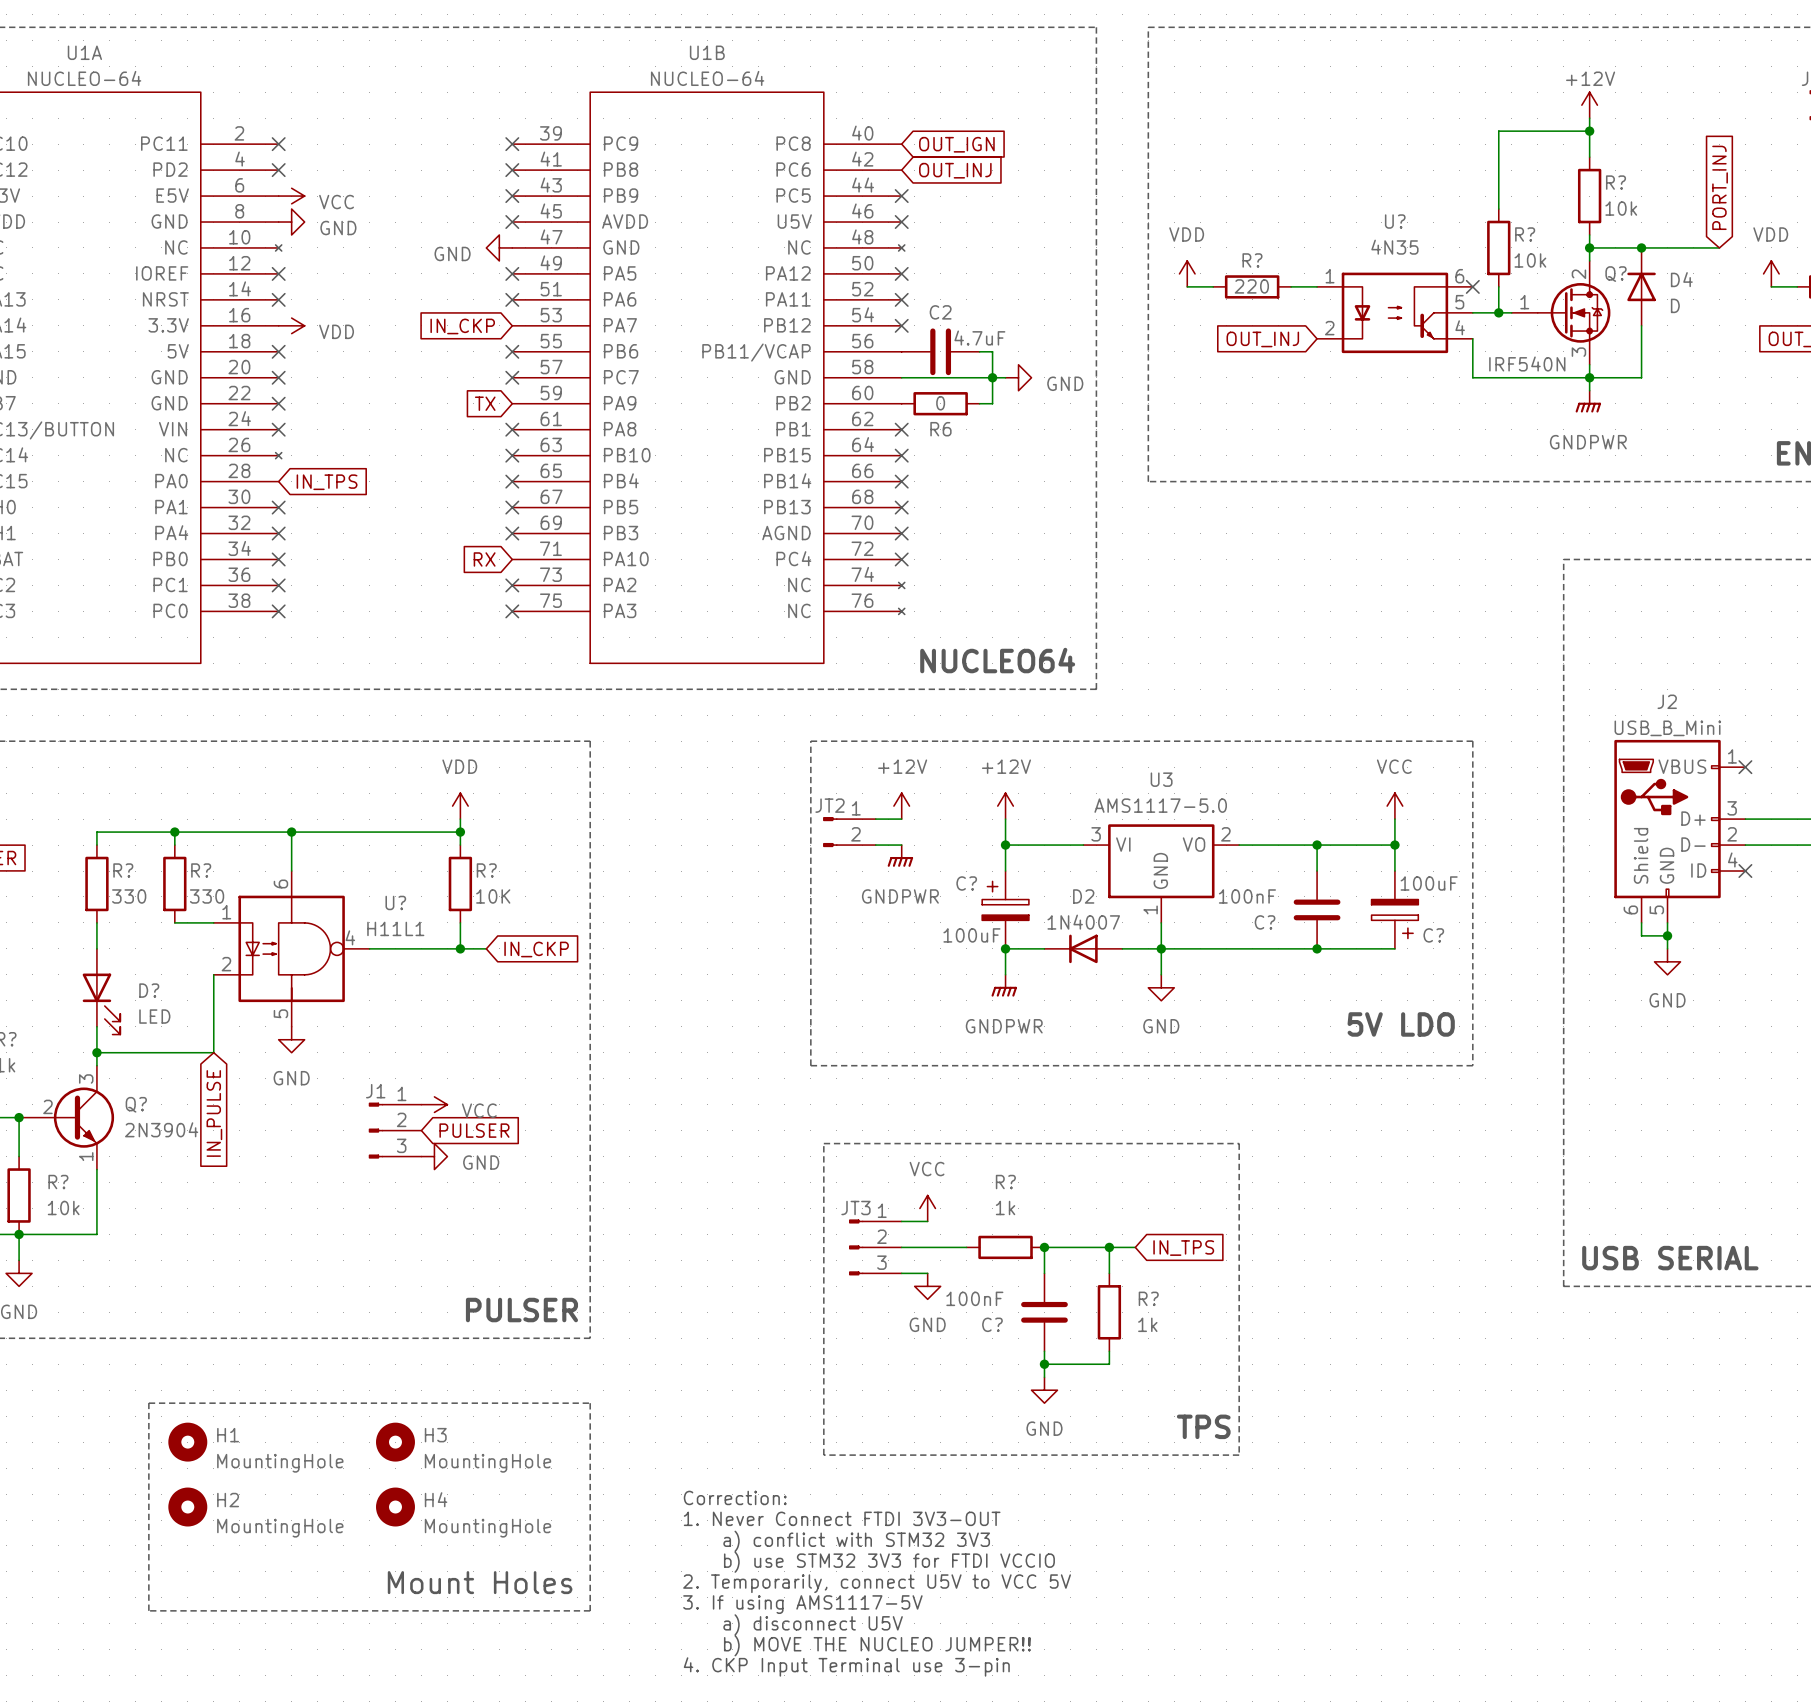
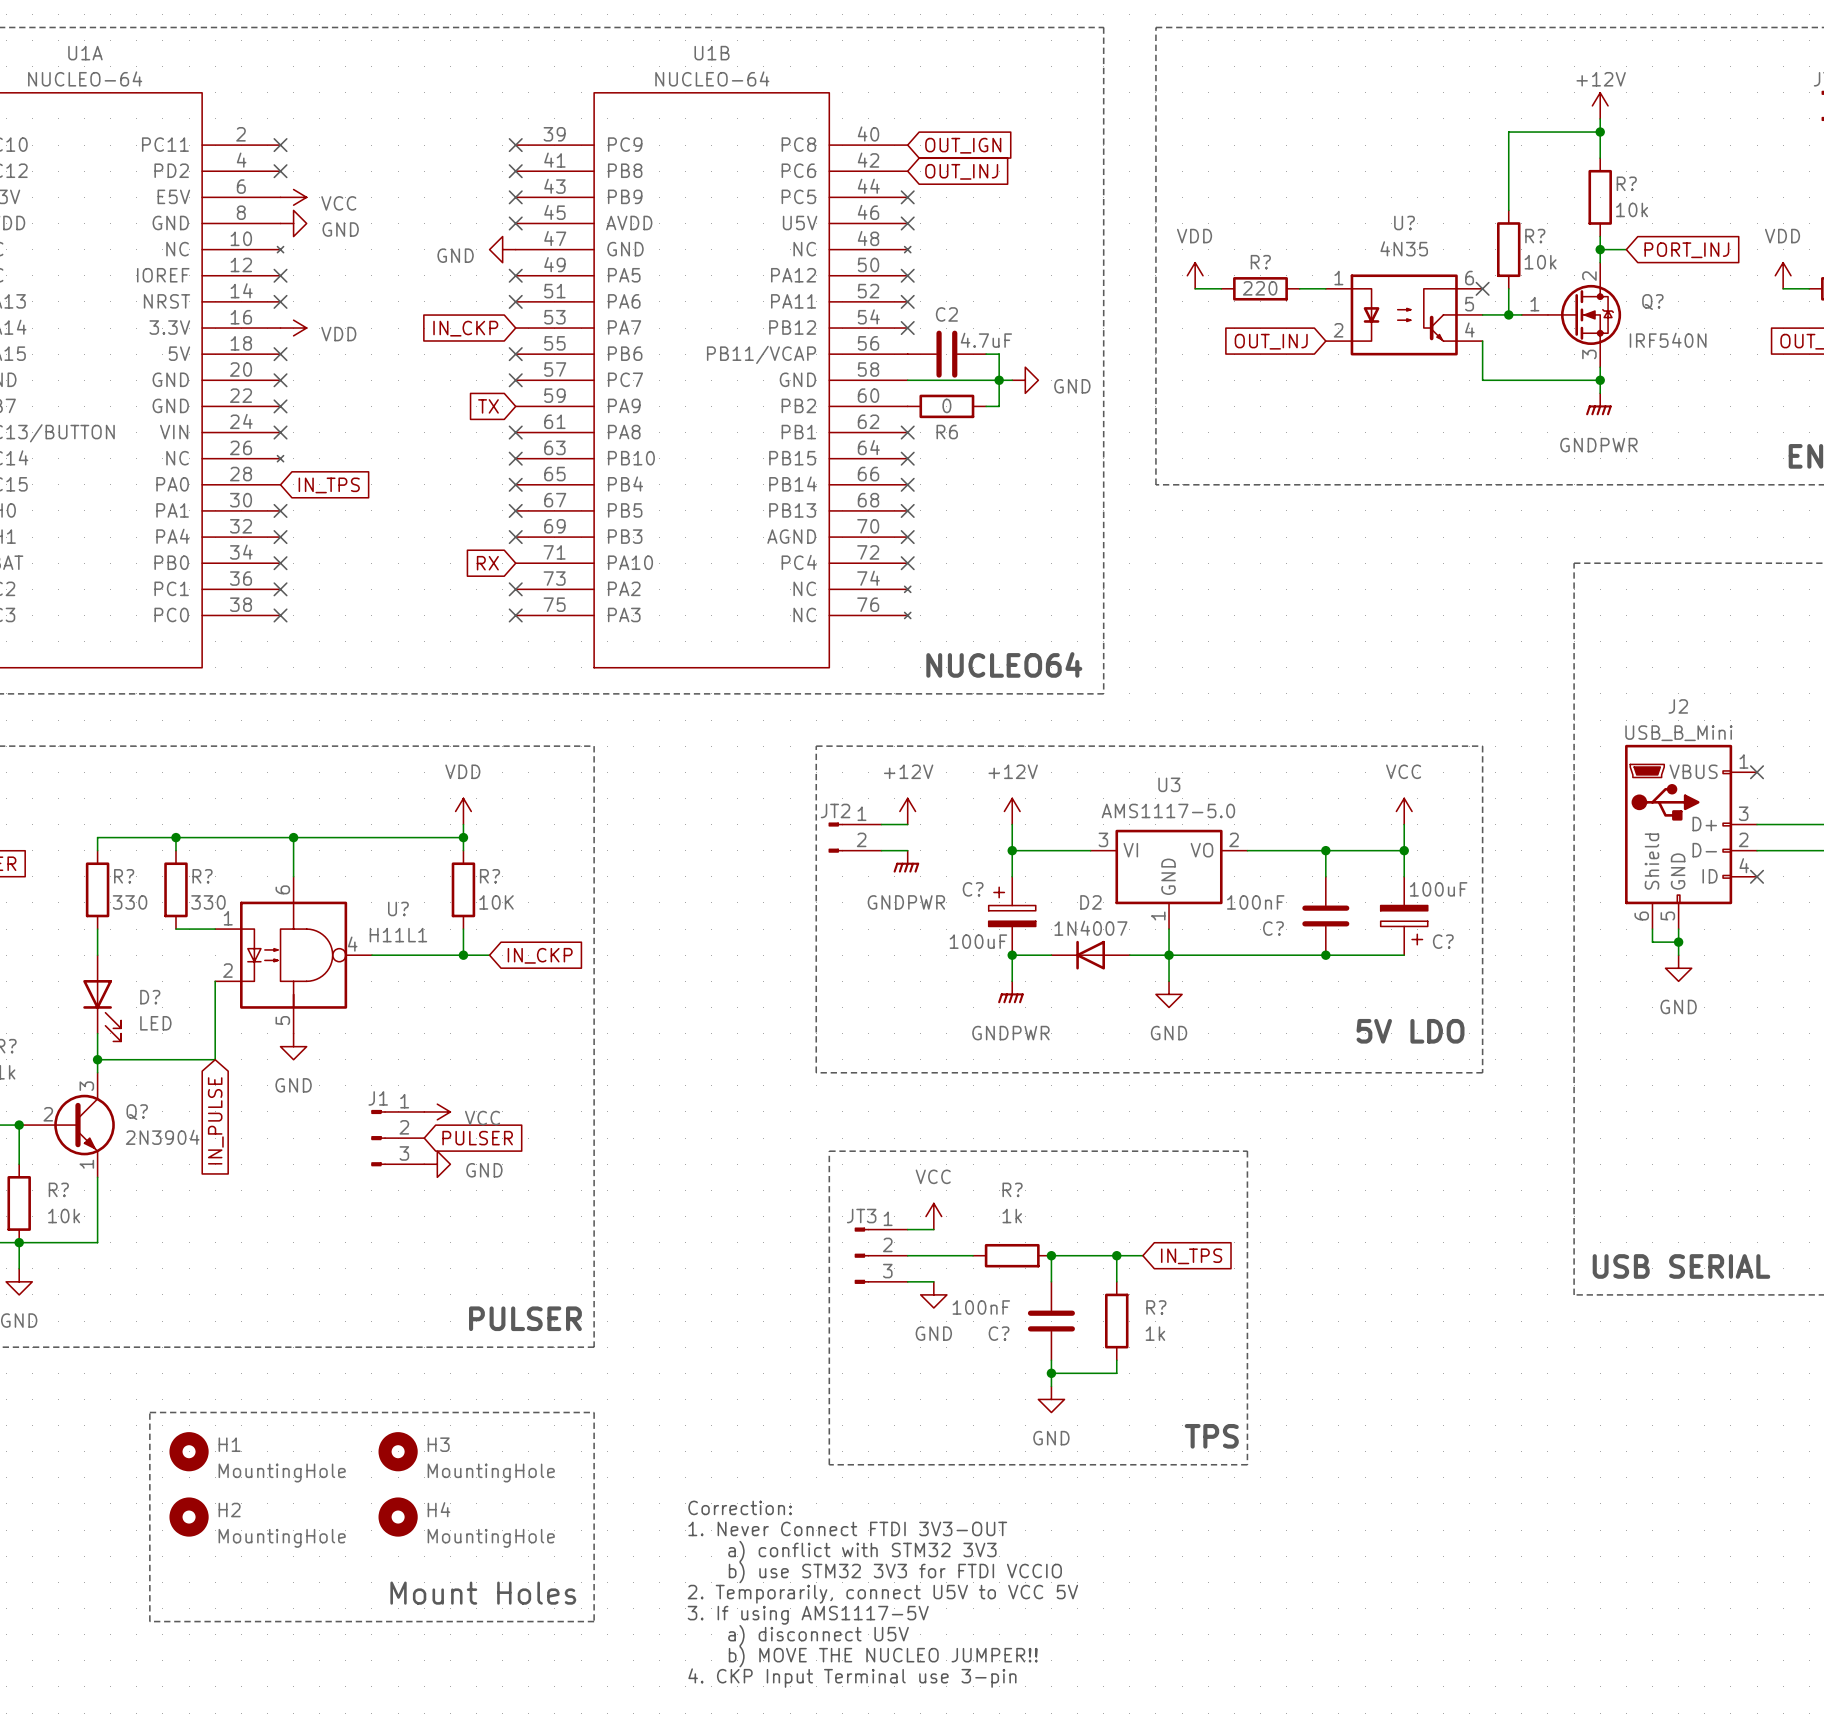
global label rotation: 0° (1720, 187) -> 90° clockwise (1686, 250)
wire: (1615, 247) (1719, 247) -> none
junction: (1641, 247) -> none
Q? name position: Q? (1616, 274) -> Q? (1652, 302)
D4: D (1641, 286) -> none
wire: (1641, 325) (1641, 377) (1589, 377) -> none
Q? value position: IRF540N (1527, 363) -> IRF540N (1668, 340)

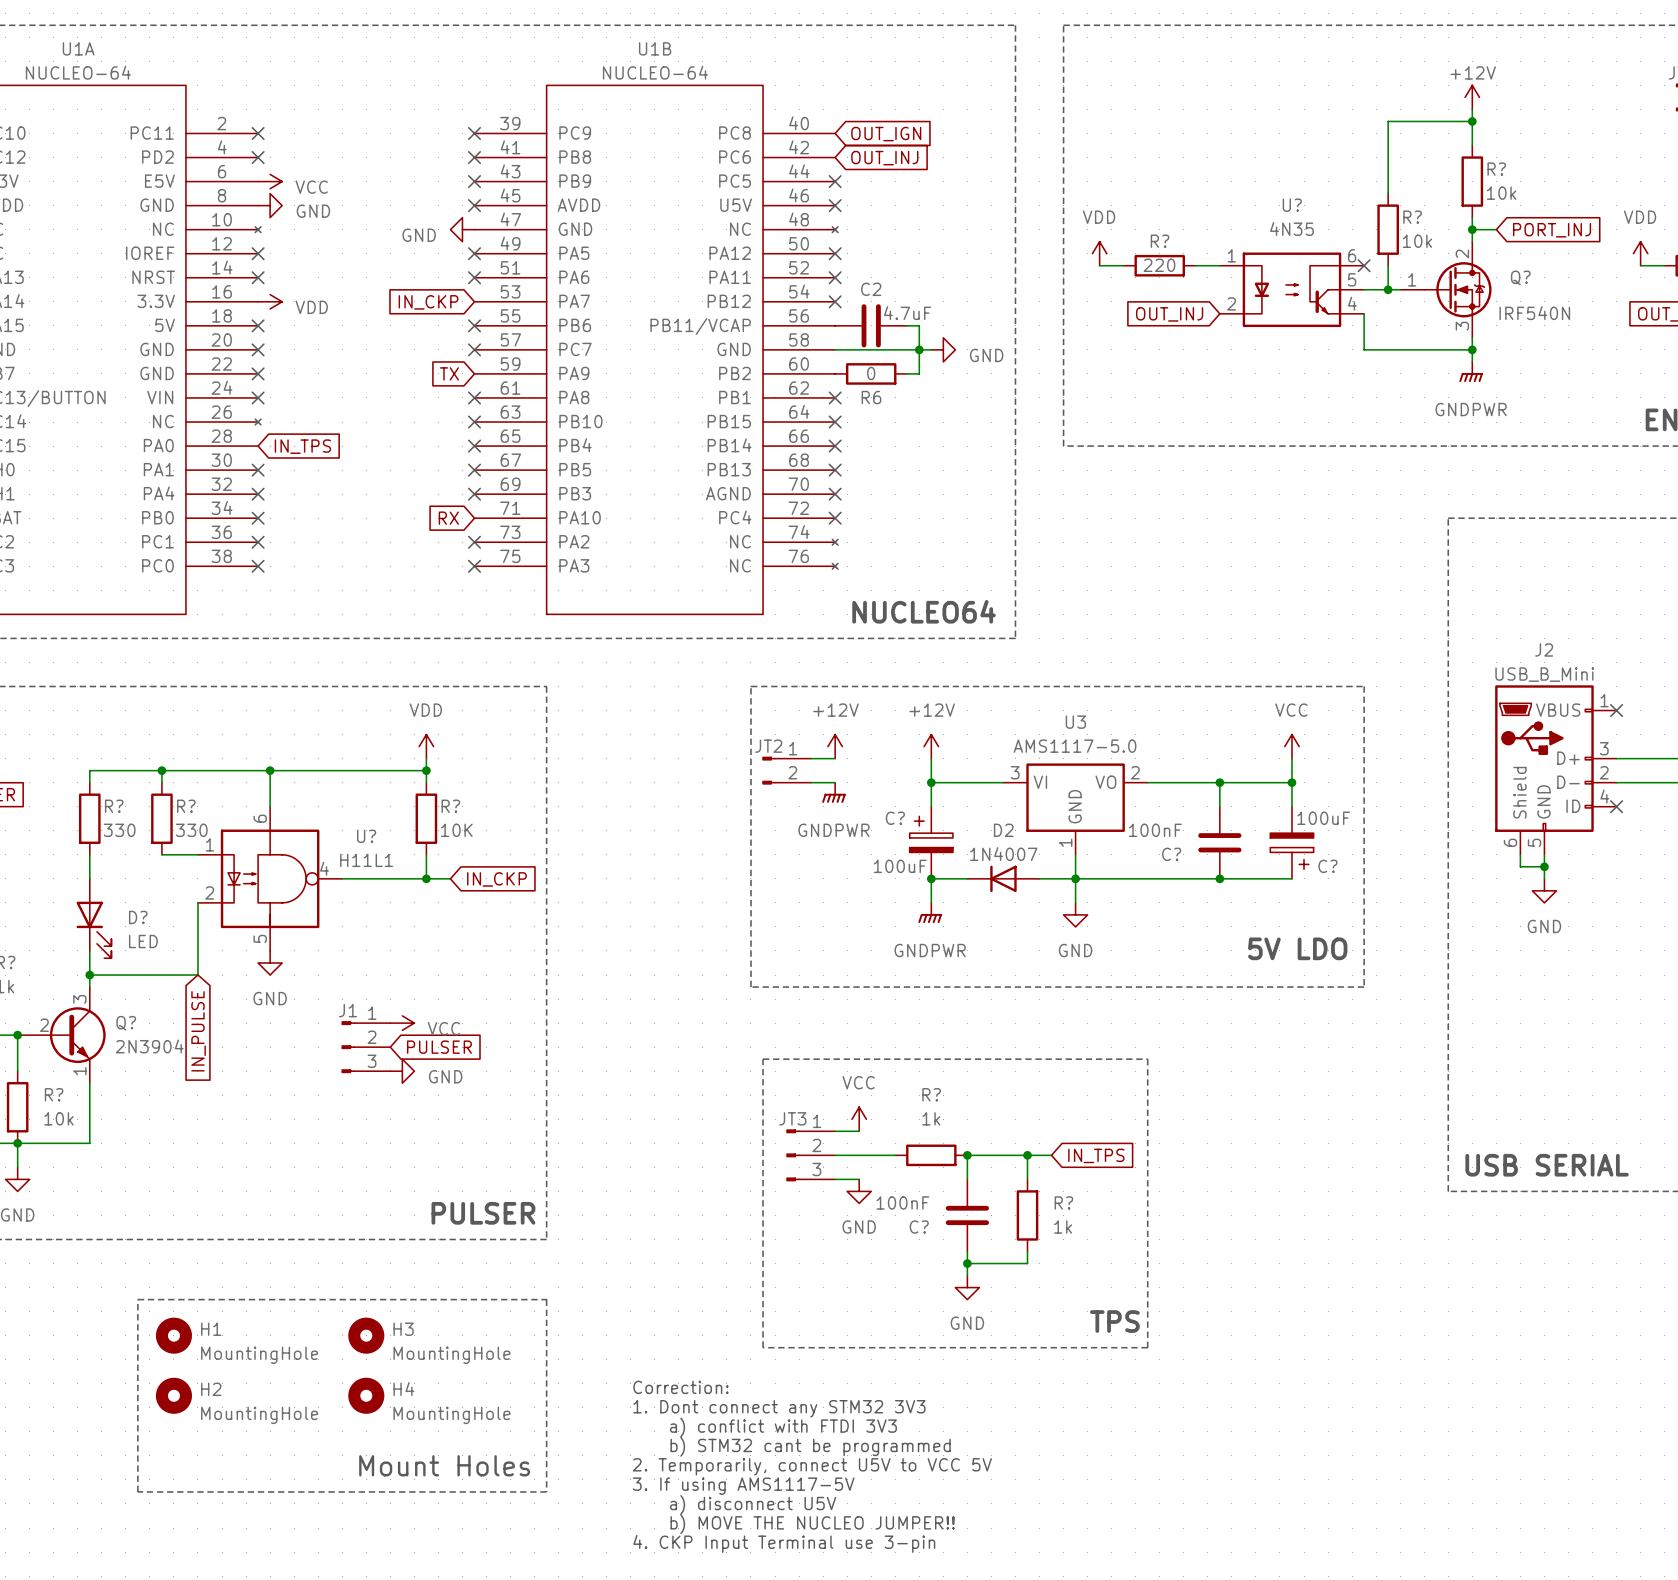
text: 1. Never Connect FTDI 3V3-OUT (847, 1528) -> 1. Dont connect any STM32 3V3 (779, 1408)
text: a) conflict with STM32 3V3 (862, 1551) -> a) conflict with FTDI 3V3 (783, 1427)
text: b) use STM32 3V3 for FTDI VCCIO (895, 1572) -> b) STM32 cant be programmed (810, 1446)

